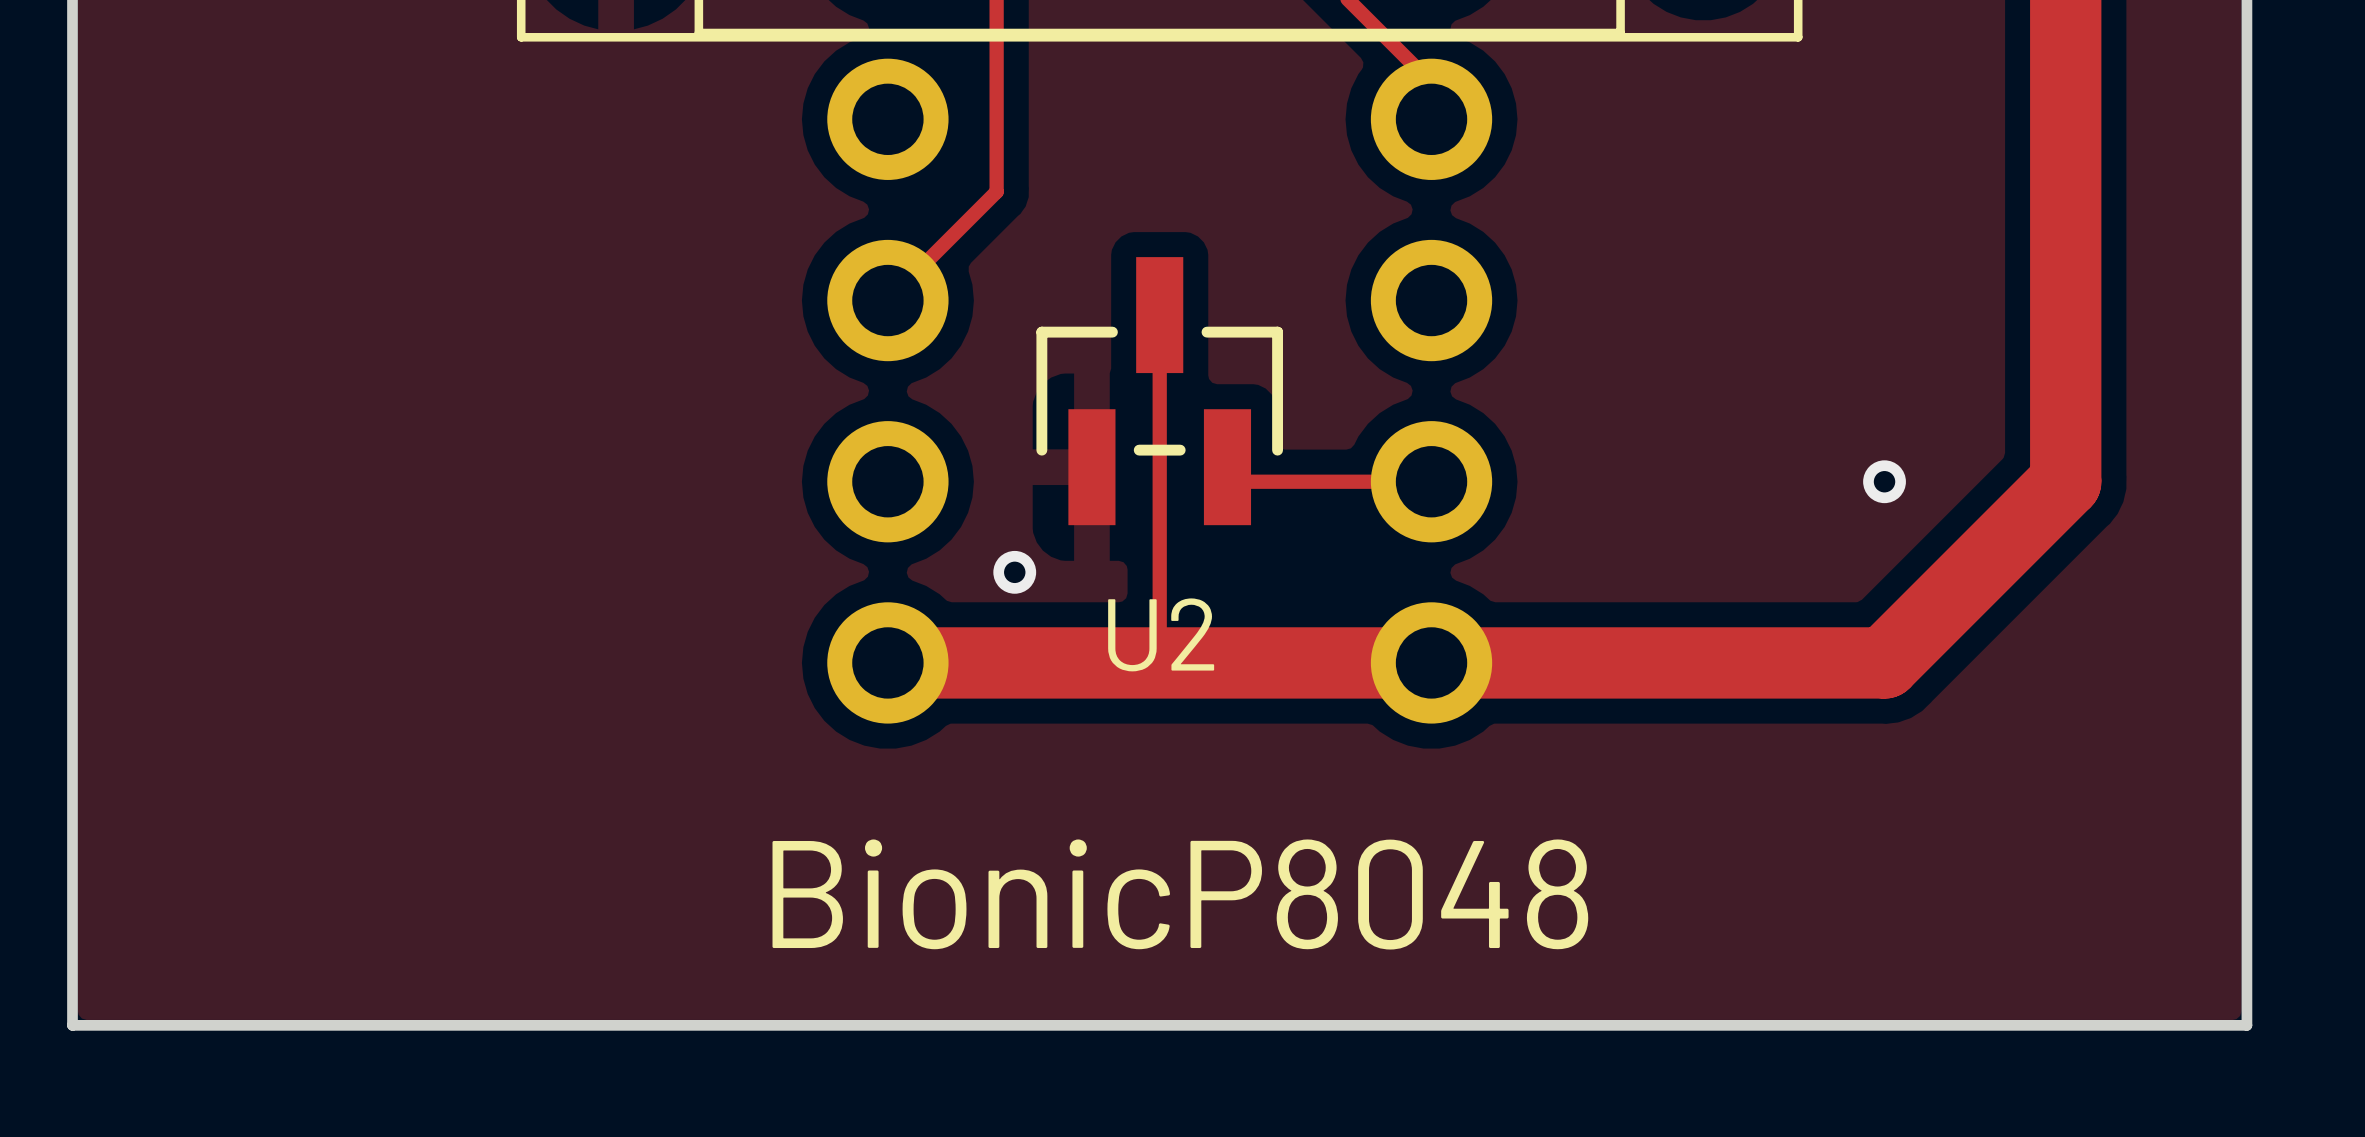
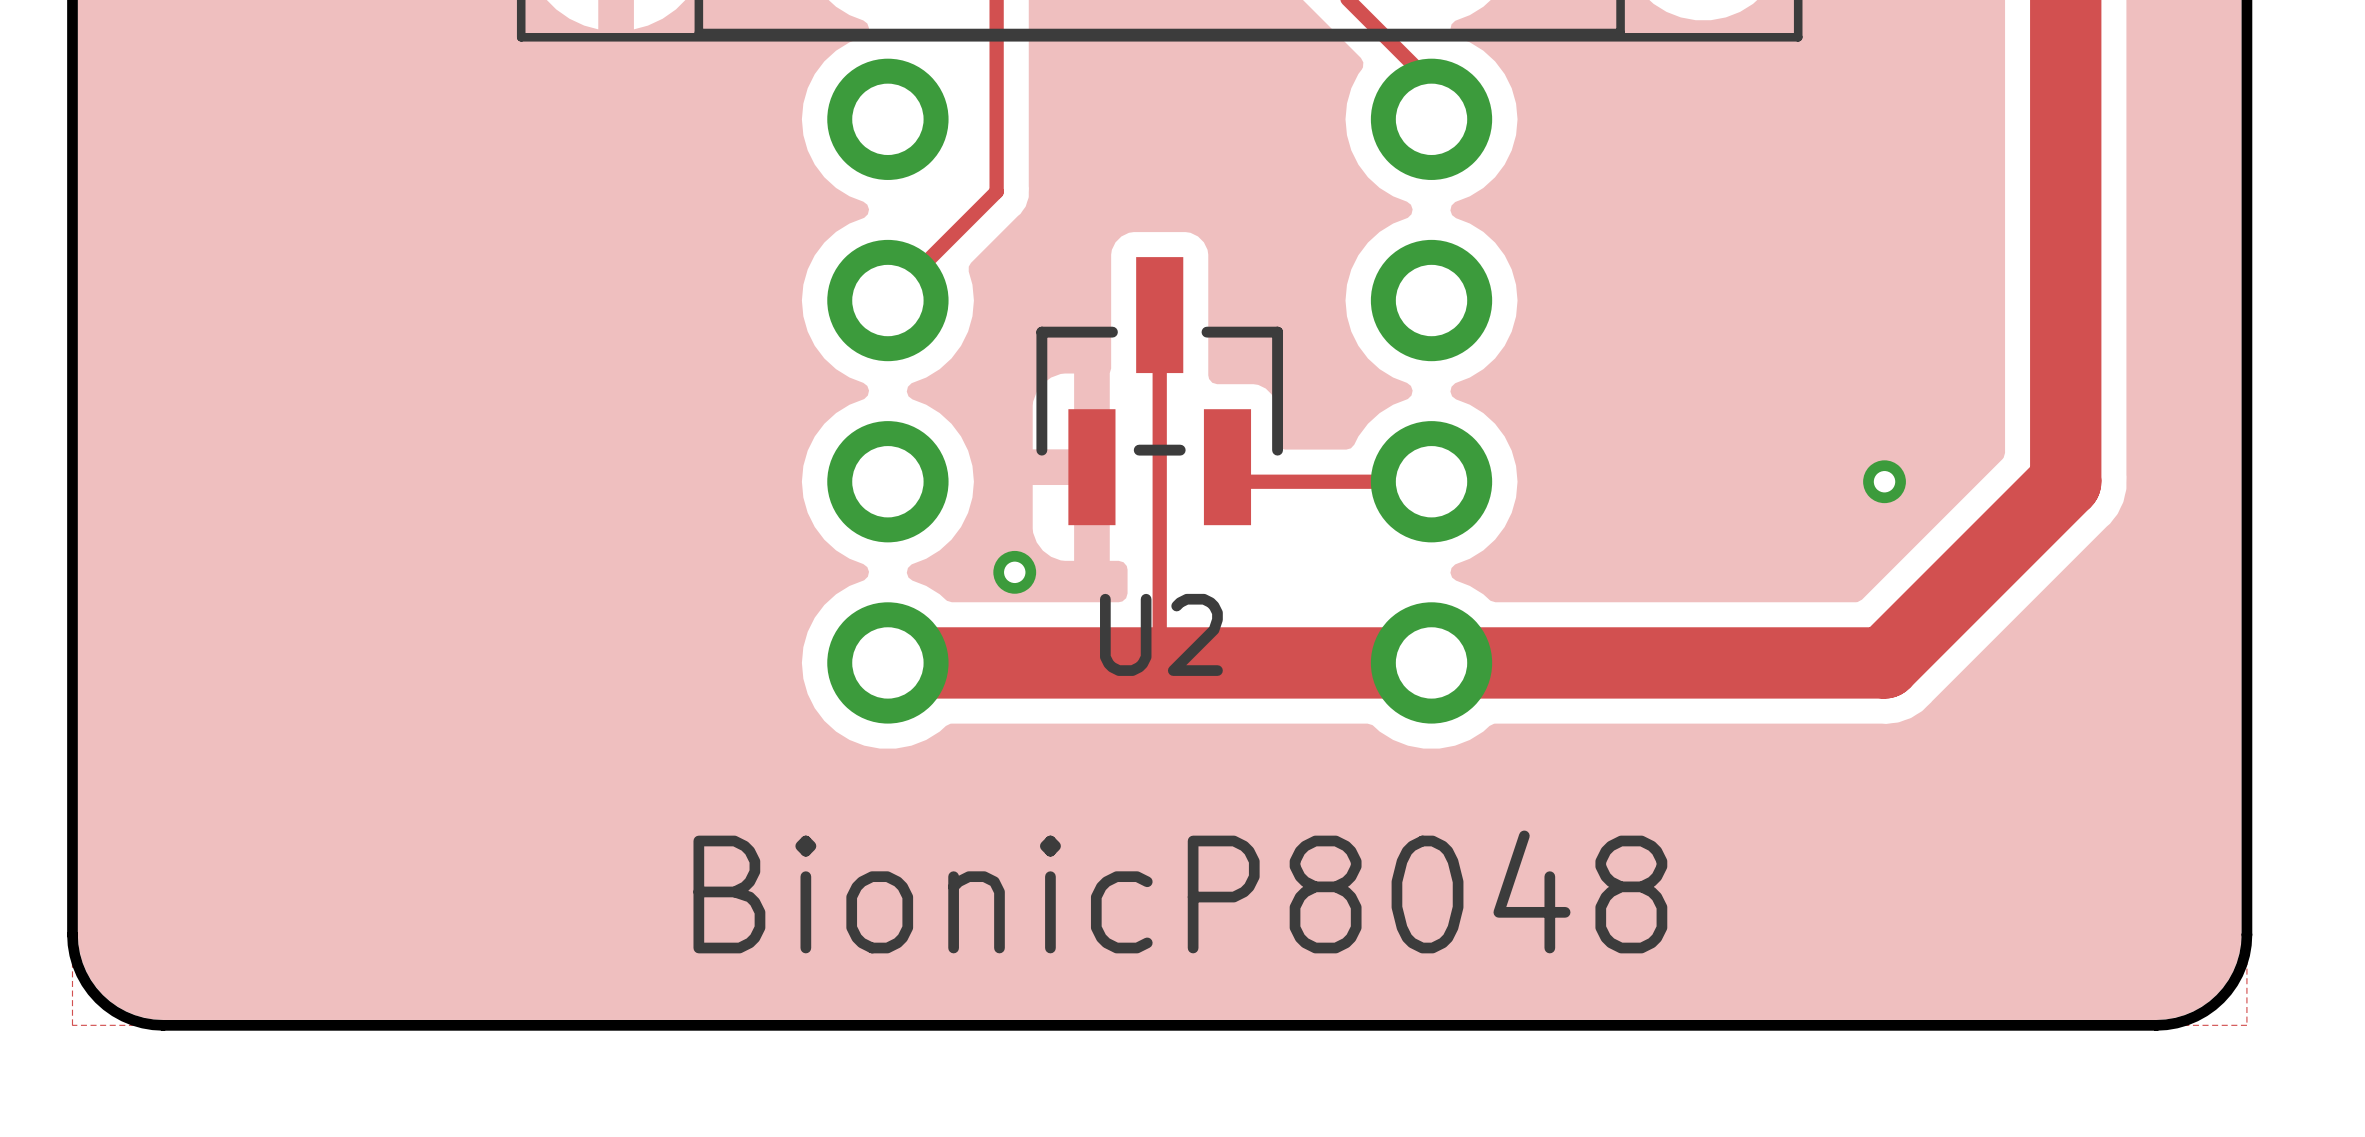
board edge: (72, 934) (72, 1025) (163, 1025) -> (72, 934) (77, 964) (86, 982) (99, 998) (123, 1016) (142, 1023) (163, 1025)
board edge: (2246, 934) (2246, 1025) (2156, 1025) -> (2246, 934) (2244, 954) (2237, 974) (2220, 998) (2204, 1011) (2186, 1020) (2156, 1025)

